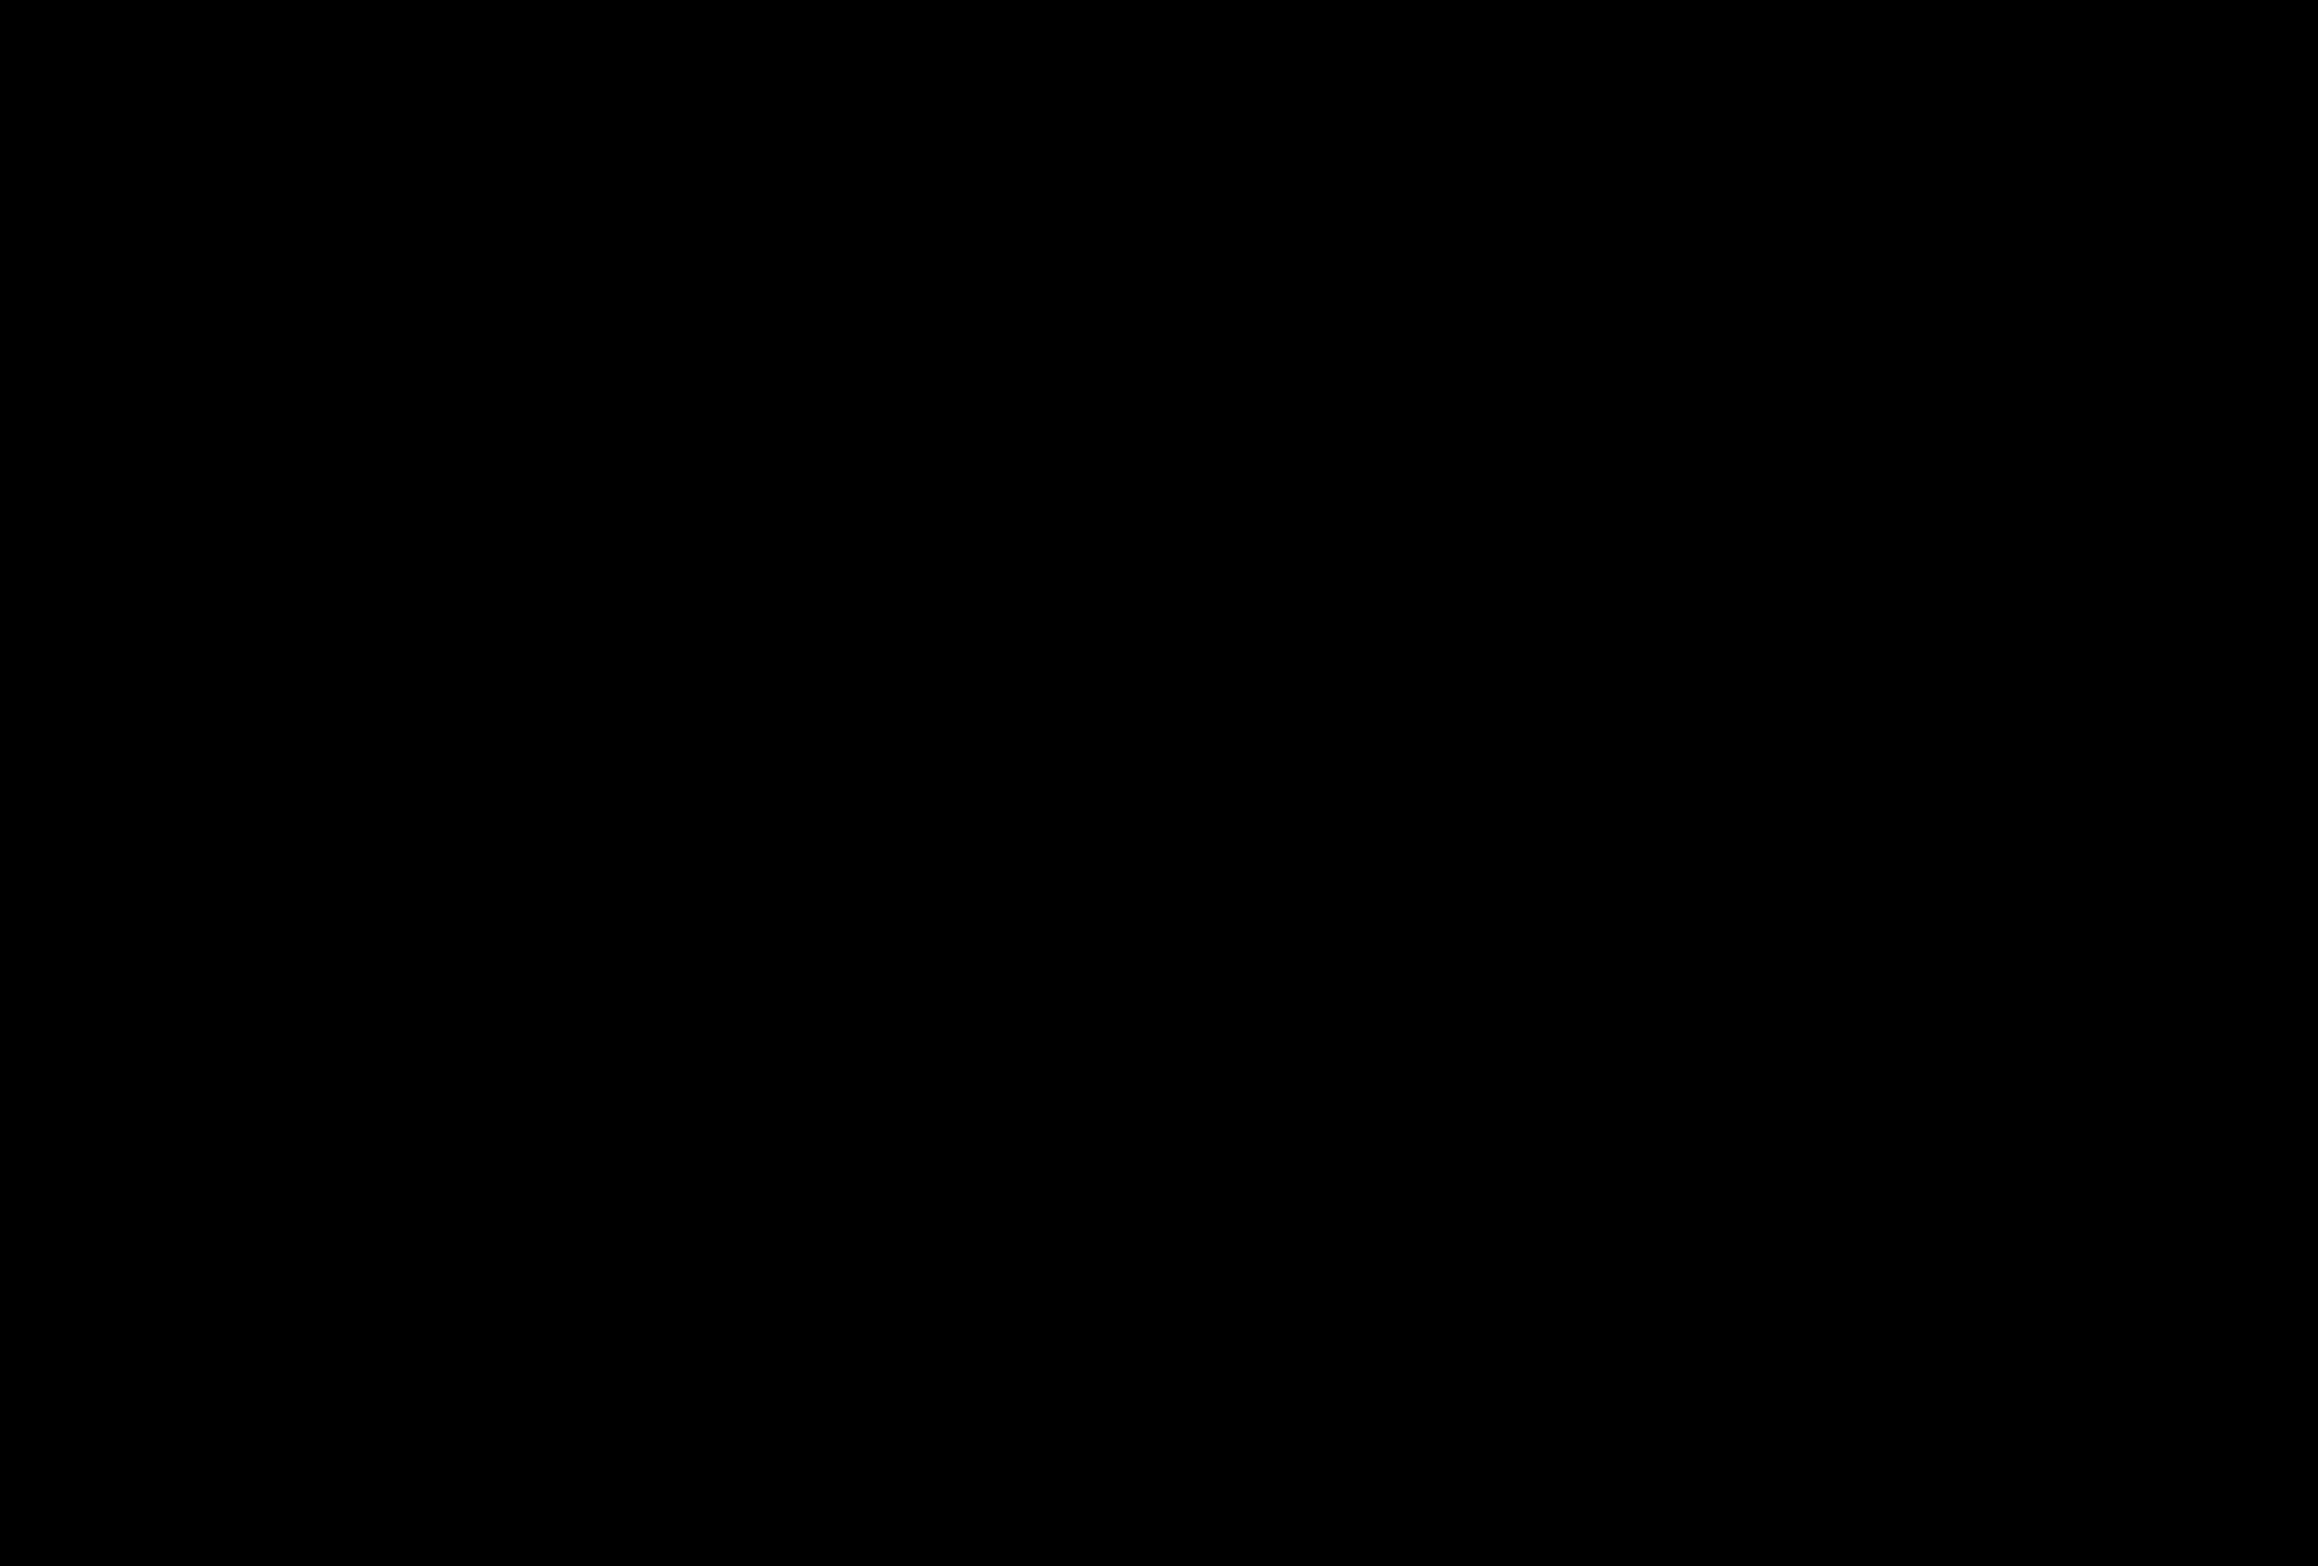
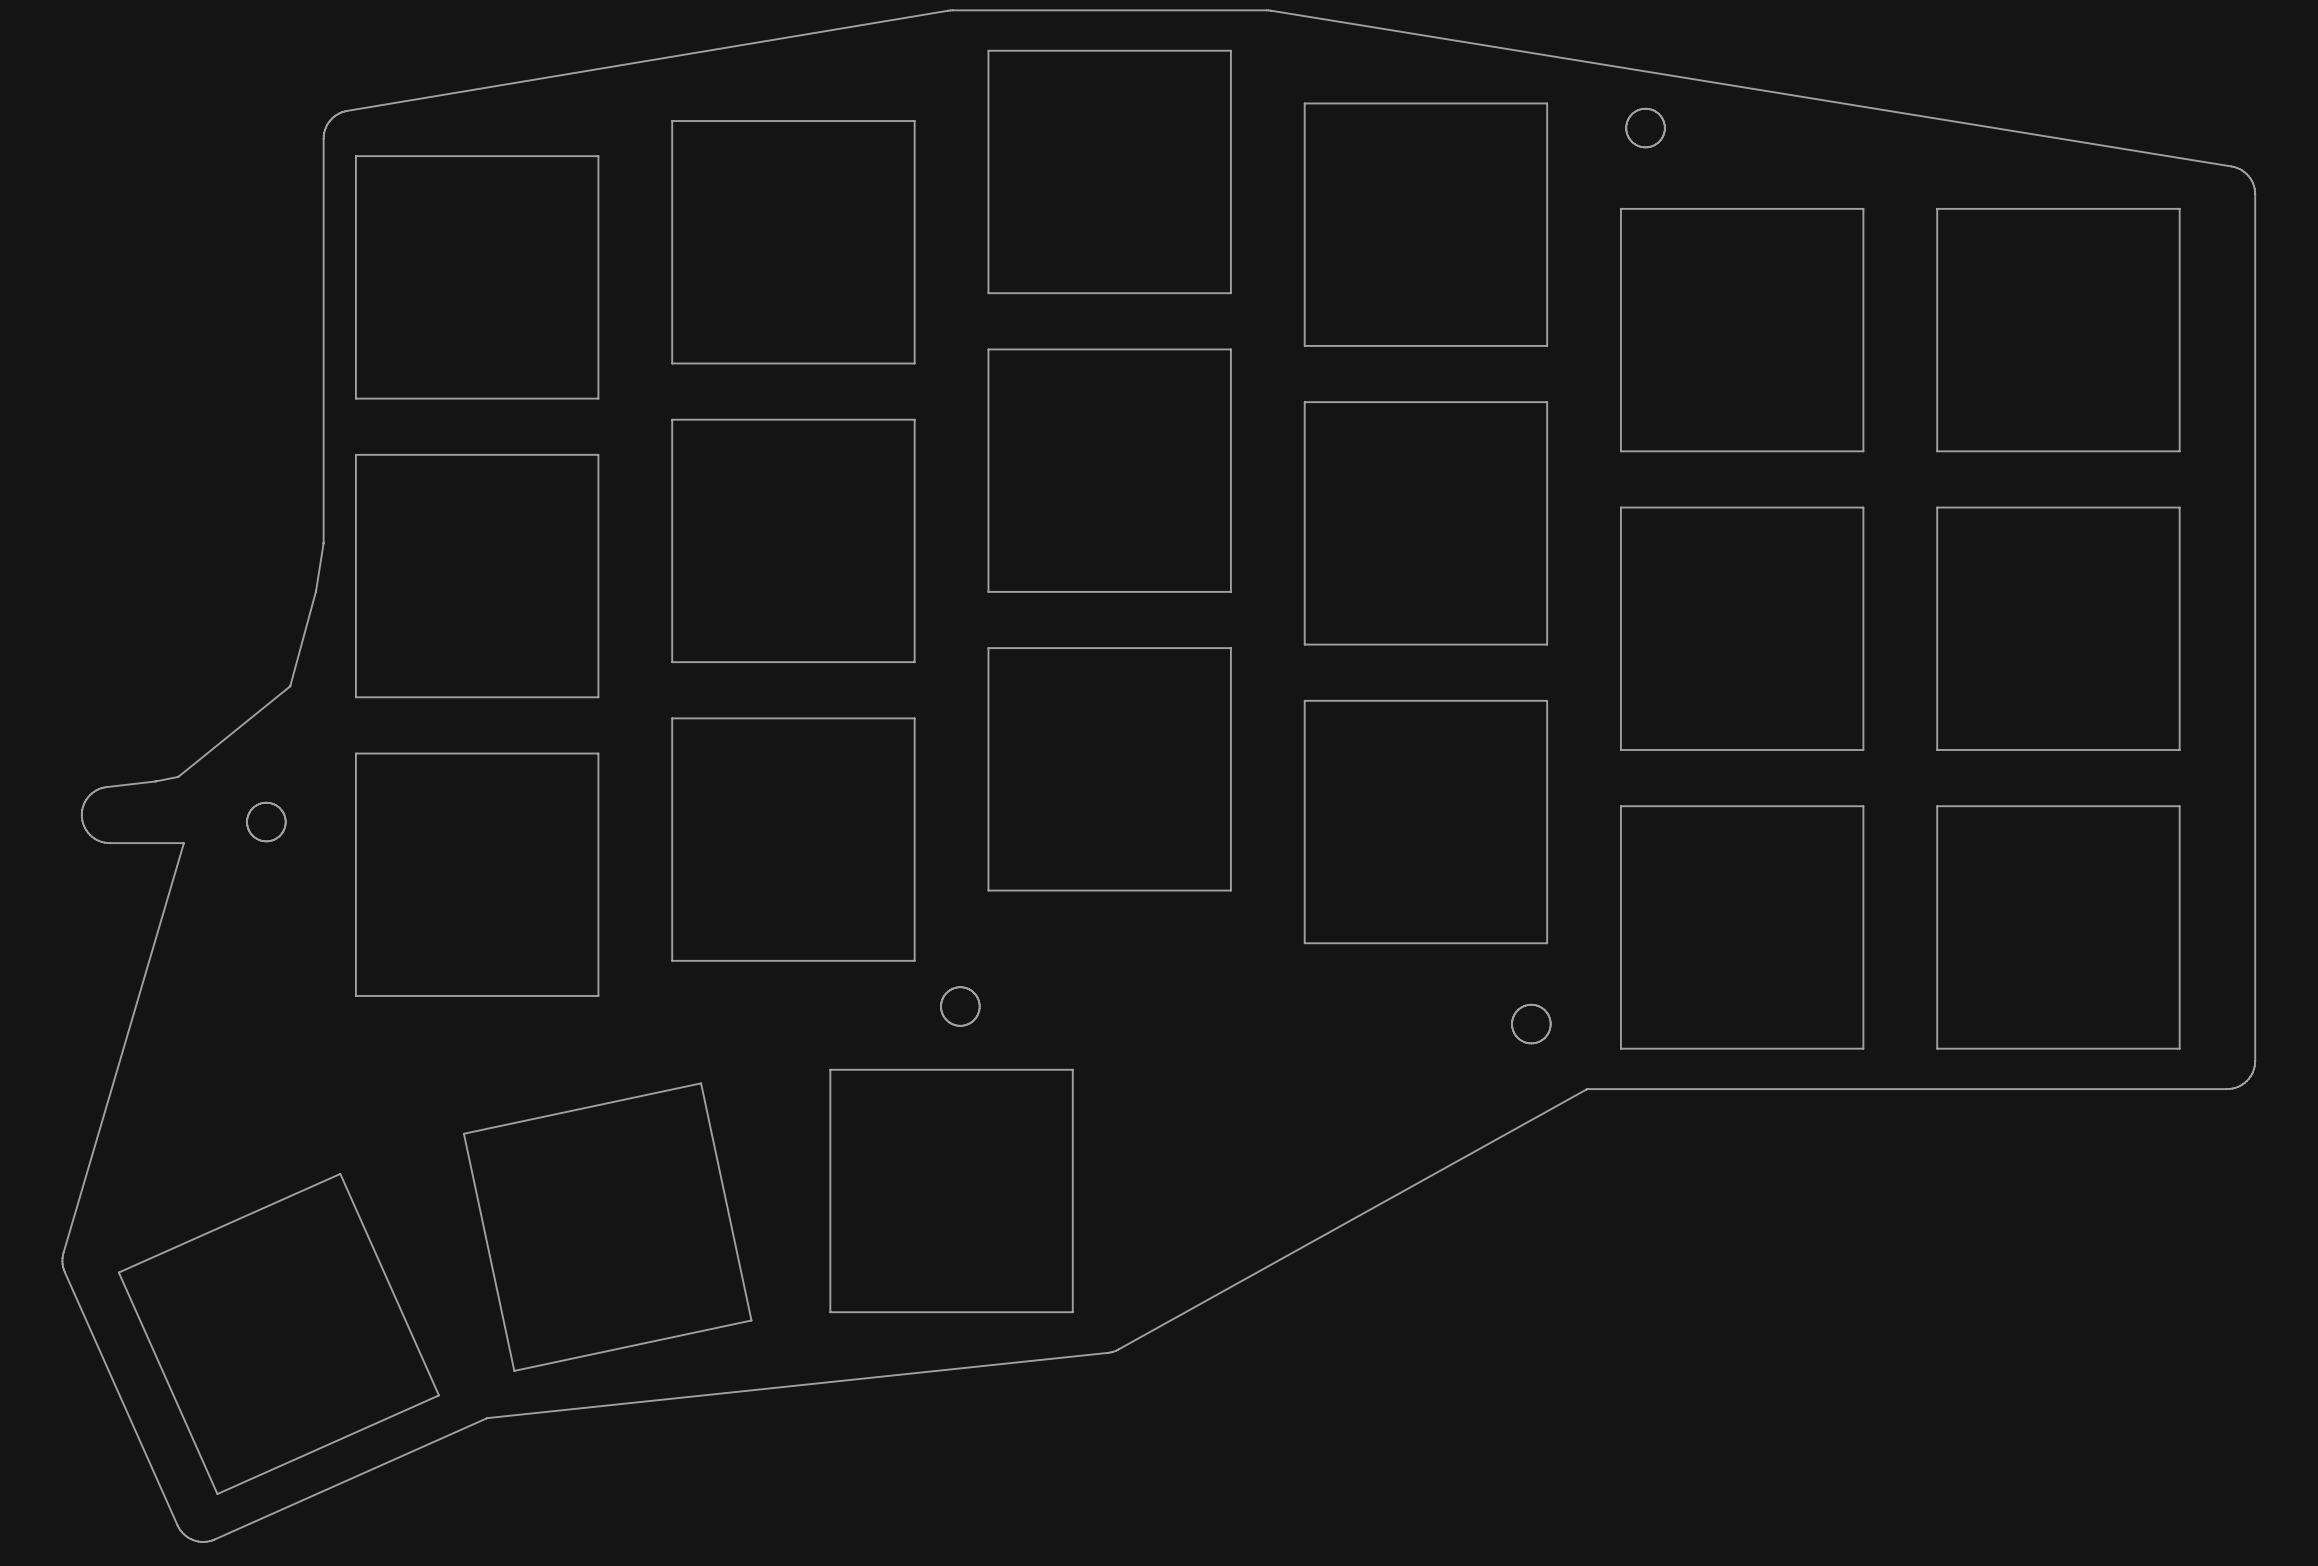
board edge: none -> (952, 10) (347, 110) (336, 114) (327, 125) (323, 138) (323, 543) (315, 591) (290, 686) (178, 776) (101, 788) (87, 797) (81, 812) (82, 820) (86, 830) (92, 836) (101, 841) (183, 843) (62, 1261) (64, 1272) (177, 1525) (183, 1534) (190, 1538) (201, 1541) (214, 1539) (487, 1418) (1113, 1351) (1587, 1089) (2227, 1089) (2240, 1085) (2251, 1074) (2255, 1060) (2255, 194) (2251, 180) (2244, 172) (2231, 166) (1271, 10) (952, 10)
board edge: none -> (988, 50) (1230, 50) (1230, 293) (988, 293) (988, 50)
board edge: none -> (1304, 103) (1547, 103) (1547, 345) (1304, 345) (1304, 103)
board edge: none -> (1645, 108) (1631, 114) (1626, 128) (1631, 141) (1645, 147) (1659, 141) (1664, 128) (1659, 114) (1645, 108)
board edge: none -> (672, 121) (914, 121) (914, 363) (672, 363) (672, 121)
board edge: none -> (355, 156) (598, 156) (598, 398) (355, 398) (355, 156)
board edge: none -> (1620, 208) (1863, 208) (1863, 451) (1620, 451) (1620, 208)
board edge: none -> (1937, 208) (2179, 208) (2179, 451) (1937, 451) (1937, 208)
board edge: none -> (988, 349) (988, 591) (1230, 591) (1230, 349) (988, 349)
board edge: none -> (1304, 402) (1304, 644) (1547, 644) (1547, 402) (1304, 402)
board edge: none -> (672, 419) (672, 662) (914, 662) (914, 419) (672, 419)
board edge: none -> (355, 454) (355, 697) (598, 697) (598, 454) (355, 454)
board edge: none -> (1620, 507) (1620, 750) (1863, 750) (1863, 507) (1620, 507)
board edge: none -> (1937, 507) (2179, 507) (2179, 750) (1937, 750) (1937, 507)
board edge: none -> (988, 648) (988, 890) (1230, 890) (1230, 648) (988, 648)
board edge: none -> (1304, 700) (1304, 943) (1547, 943) (1547, 700) (1304, 700)
board edge: none -> (672, 718) (672, 960) (914, 960) (914, 718) (672, 718)
board edge: none -> (355, 753) (355, 995) (598, 995) (598, 753) (355, 753)
board edge: none -> (266, 802) (252, 808) (247, 822) (252, 835) (266, 841) (280, 835) (285, 822) (280, 808) (266, 802)
board edge: none -> (1620, 806) (1620, 1048) (1863, 1048) (1863, 806) (1620, 806)
board edge: none -> (1937, 806) (2179, 806) (2179, 1048) (1937, 1048) (1937, 806)
board edge: none -> (960, 987) (946, 992) (941, 1006) (946, 1020) (960, 1025) (974, 1020) (979, 1006) (974, 992) (960, 987)
board edge: none -> (1531, 1004) (1517, 1010) (1512, 1024) (1517, 1037) (1531, 1043) (1545, 1037) (1550, 1024) (1545, 1010) (1531, 1004)
board edge: none -> (830, 1069) (1072, 1069) (1072, 1312) (830, 1312) (830, 1069)
board edge: none -> (701, 1083) (463, 1133) (514, 1370) (751, 1320) (701, 1083)
board edge: none -> (340, 1173) (118, 1272) (217, 1494) (438, 1395) (340, 1173)

